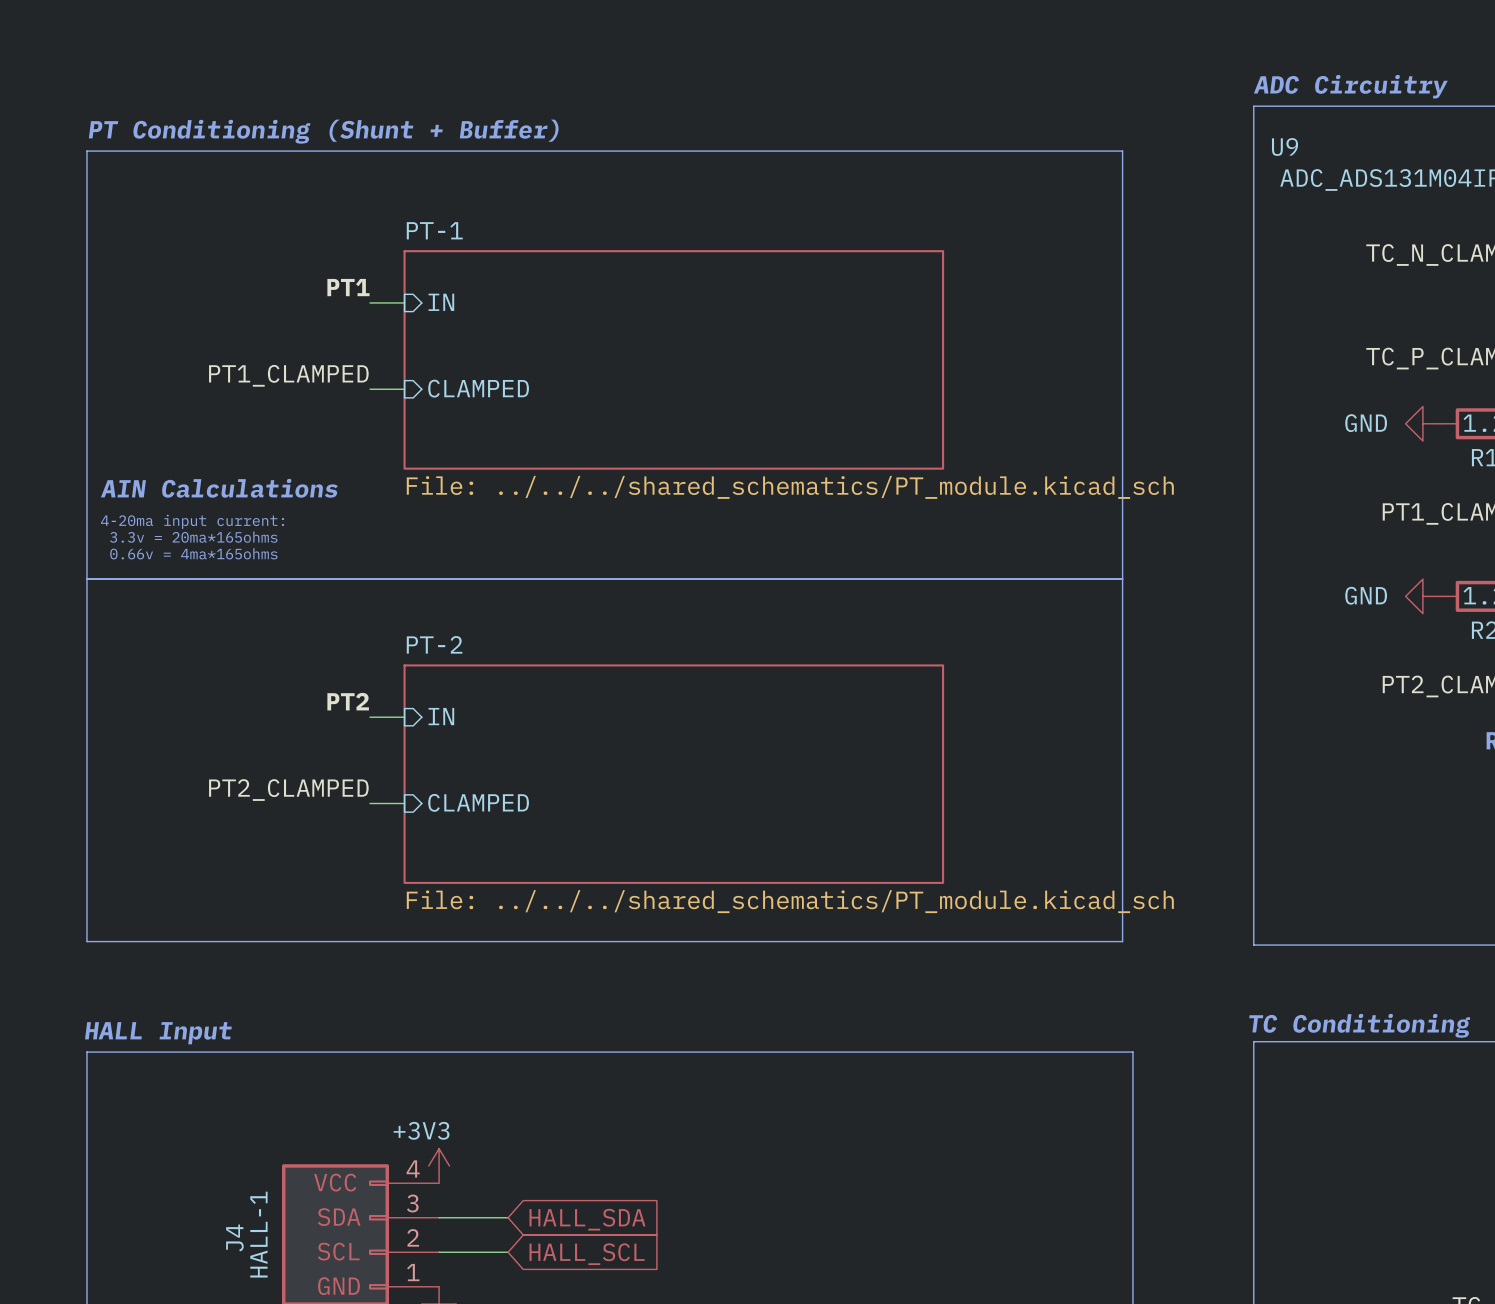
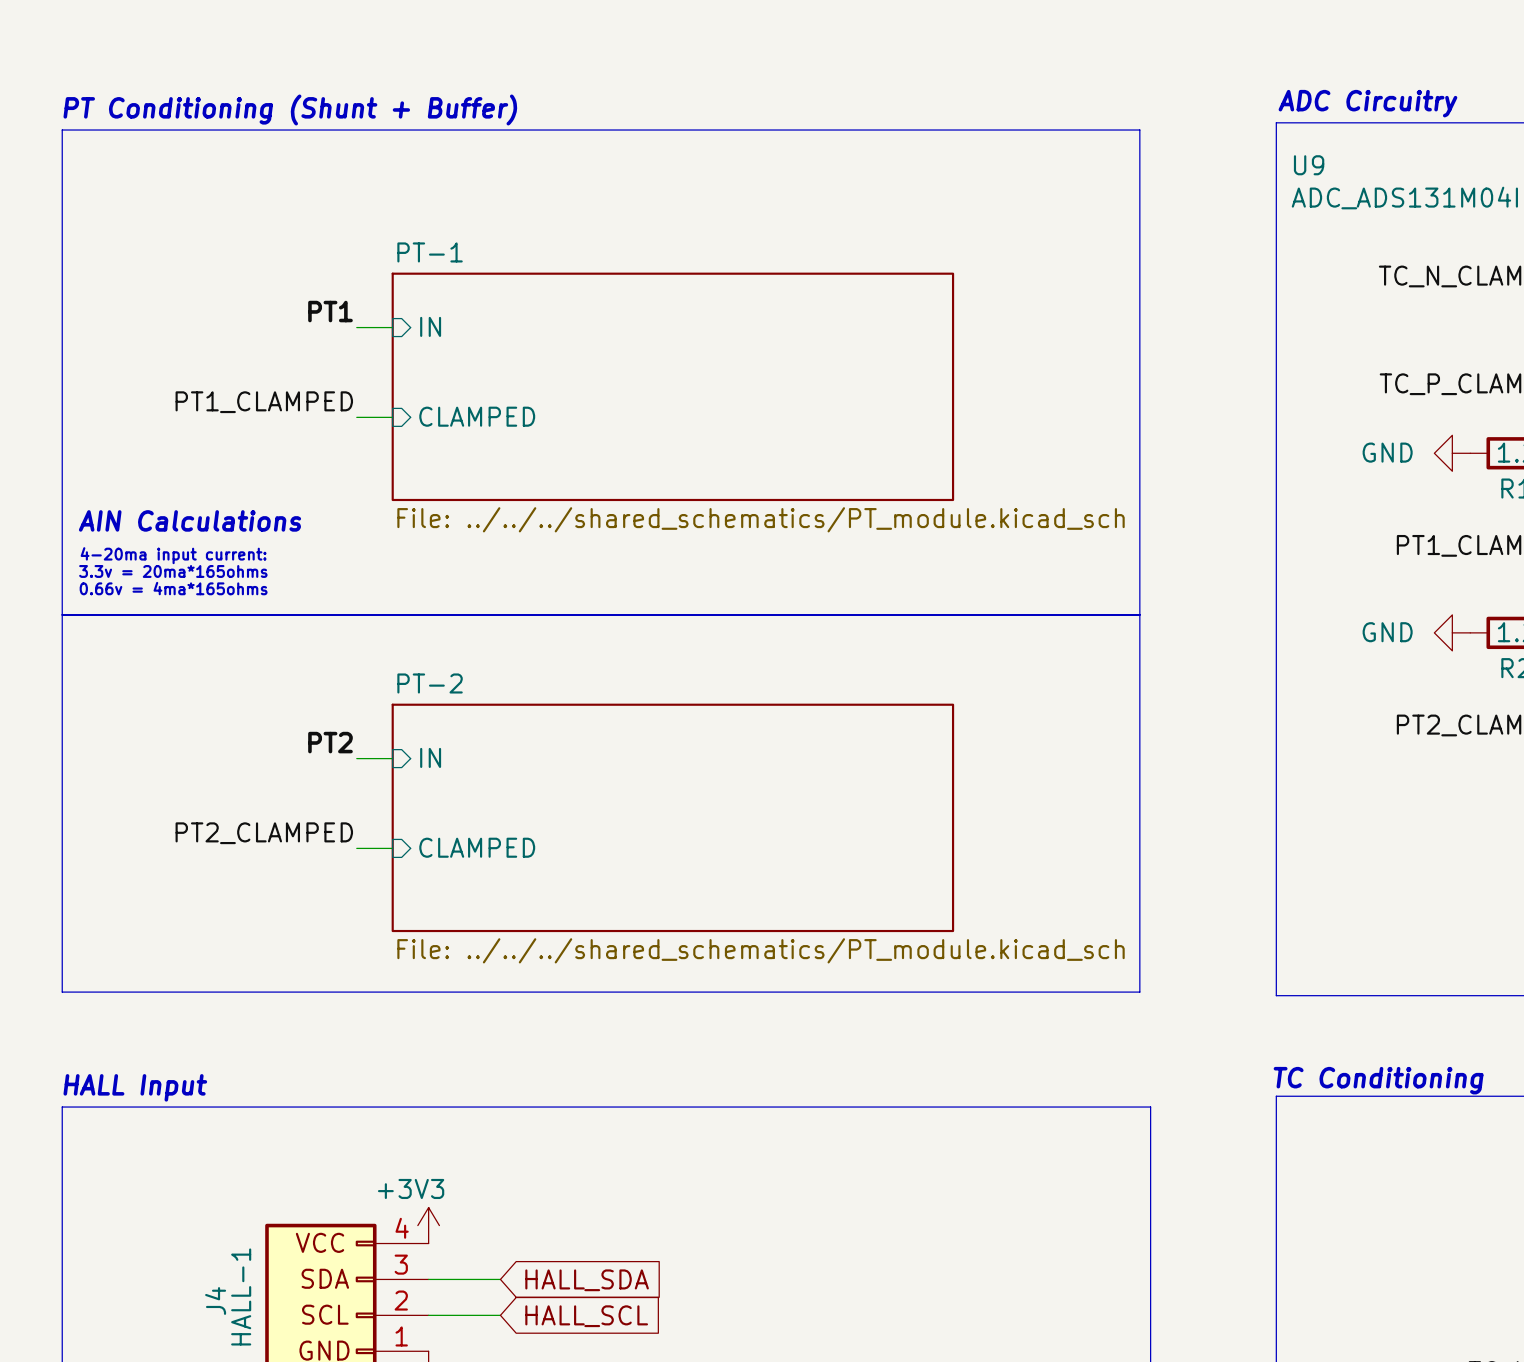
text position: PT Conditioning (Shunt + Buffer) (323, 131) -> PT Conditioning (Shunt + Buffer) (290, 109)
line: (86, 151) (1122, 151) -> (62, 169) (62, 130) (1139, 130) (1139, 169)

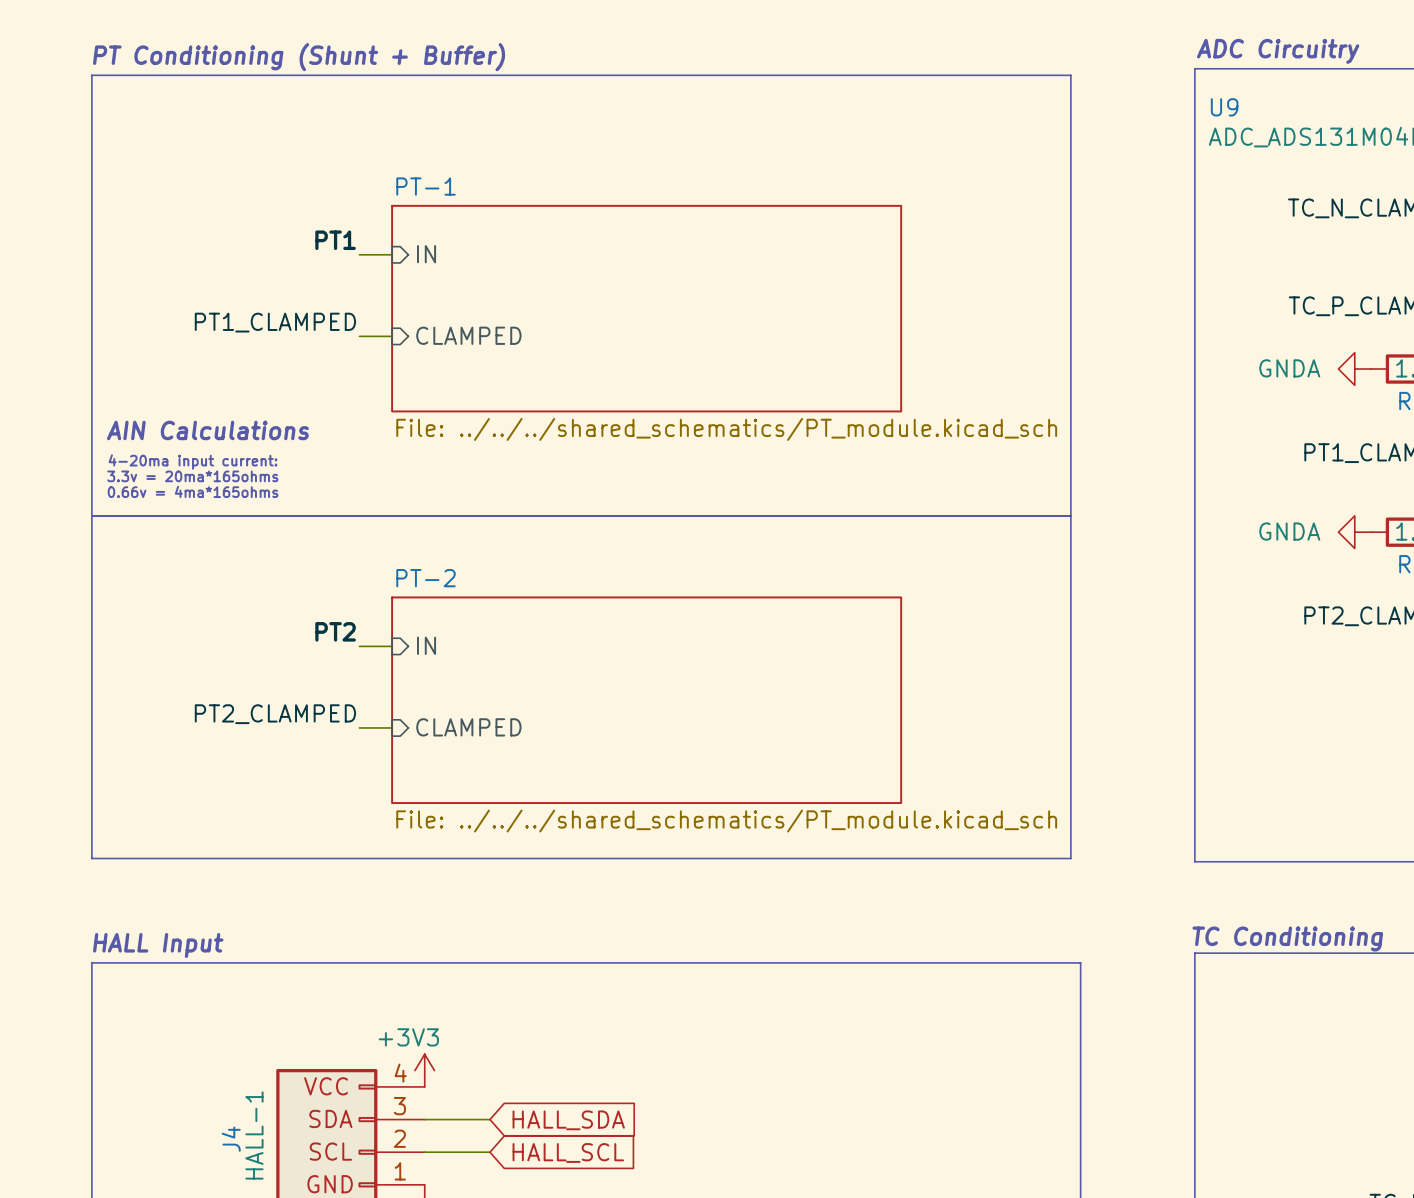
power symbol: GND (1452, 453) -> GNDA (1354, 369)
power symbol: GND (1452, 632) -> GNDA (1354, 532)

